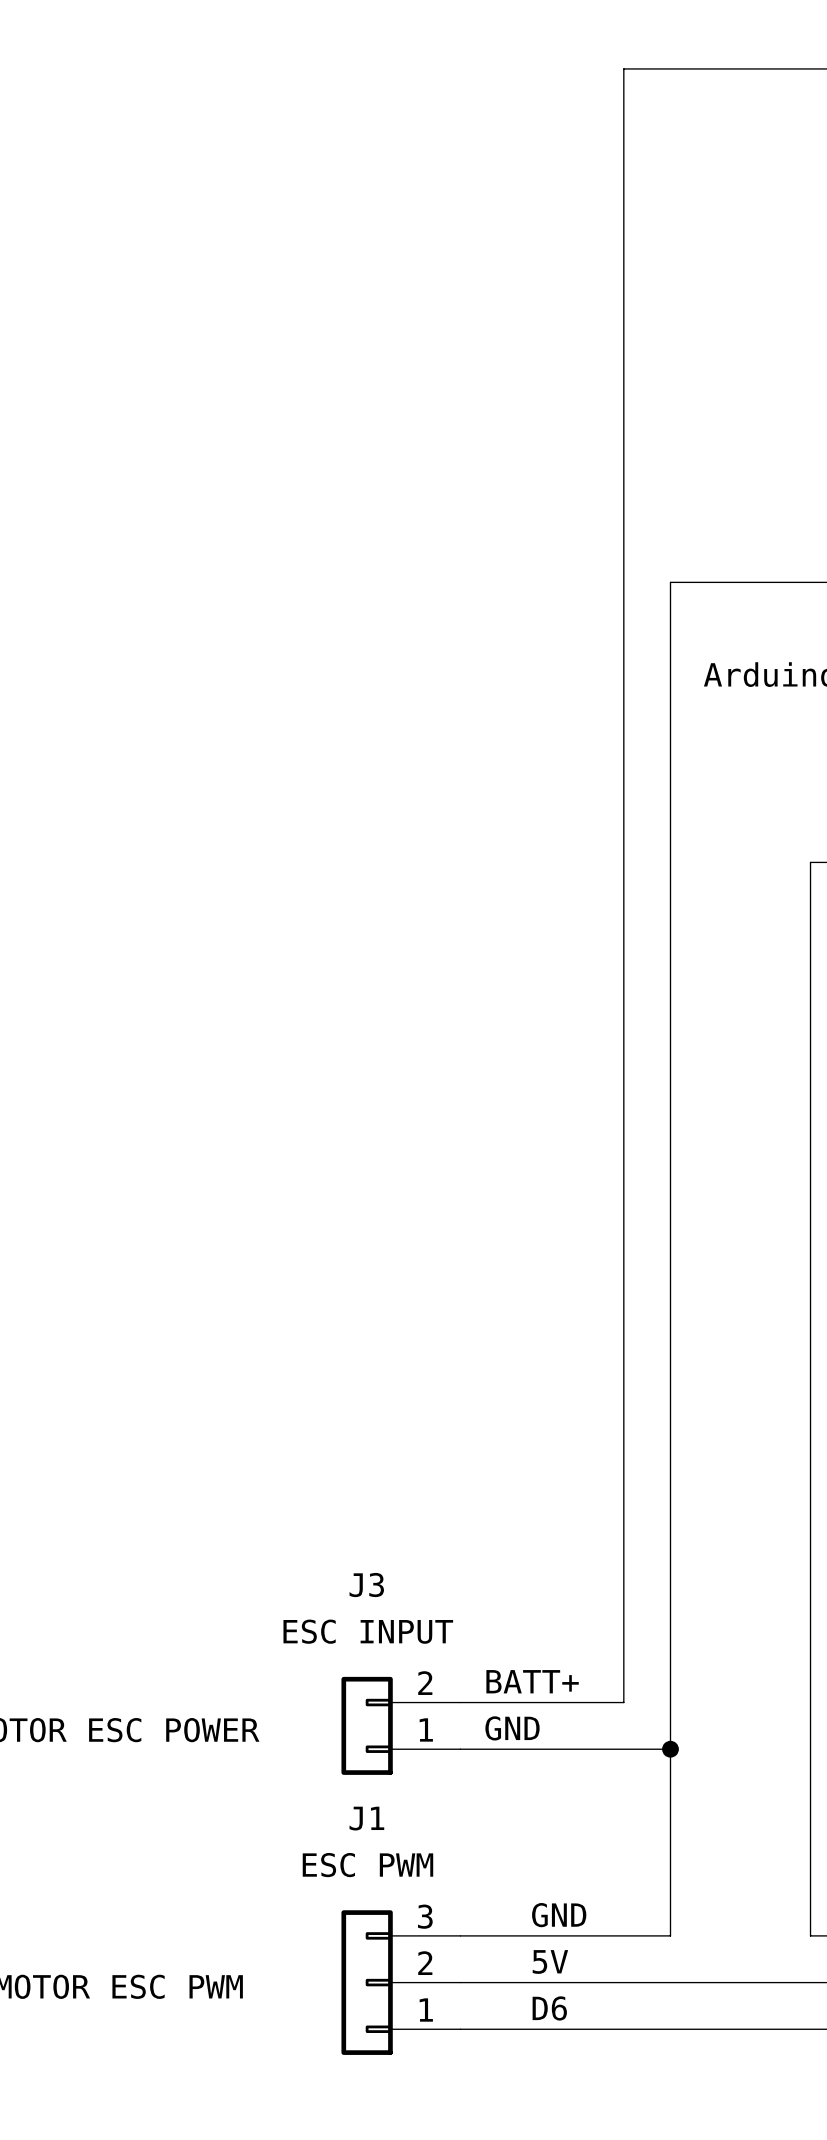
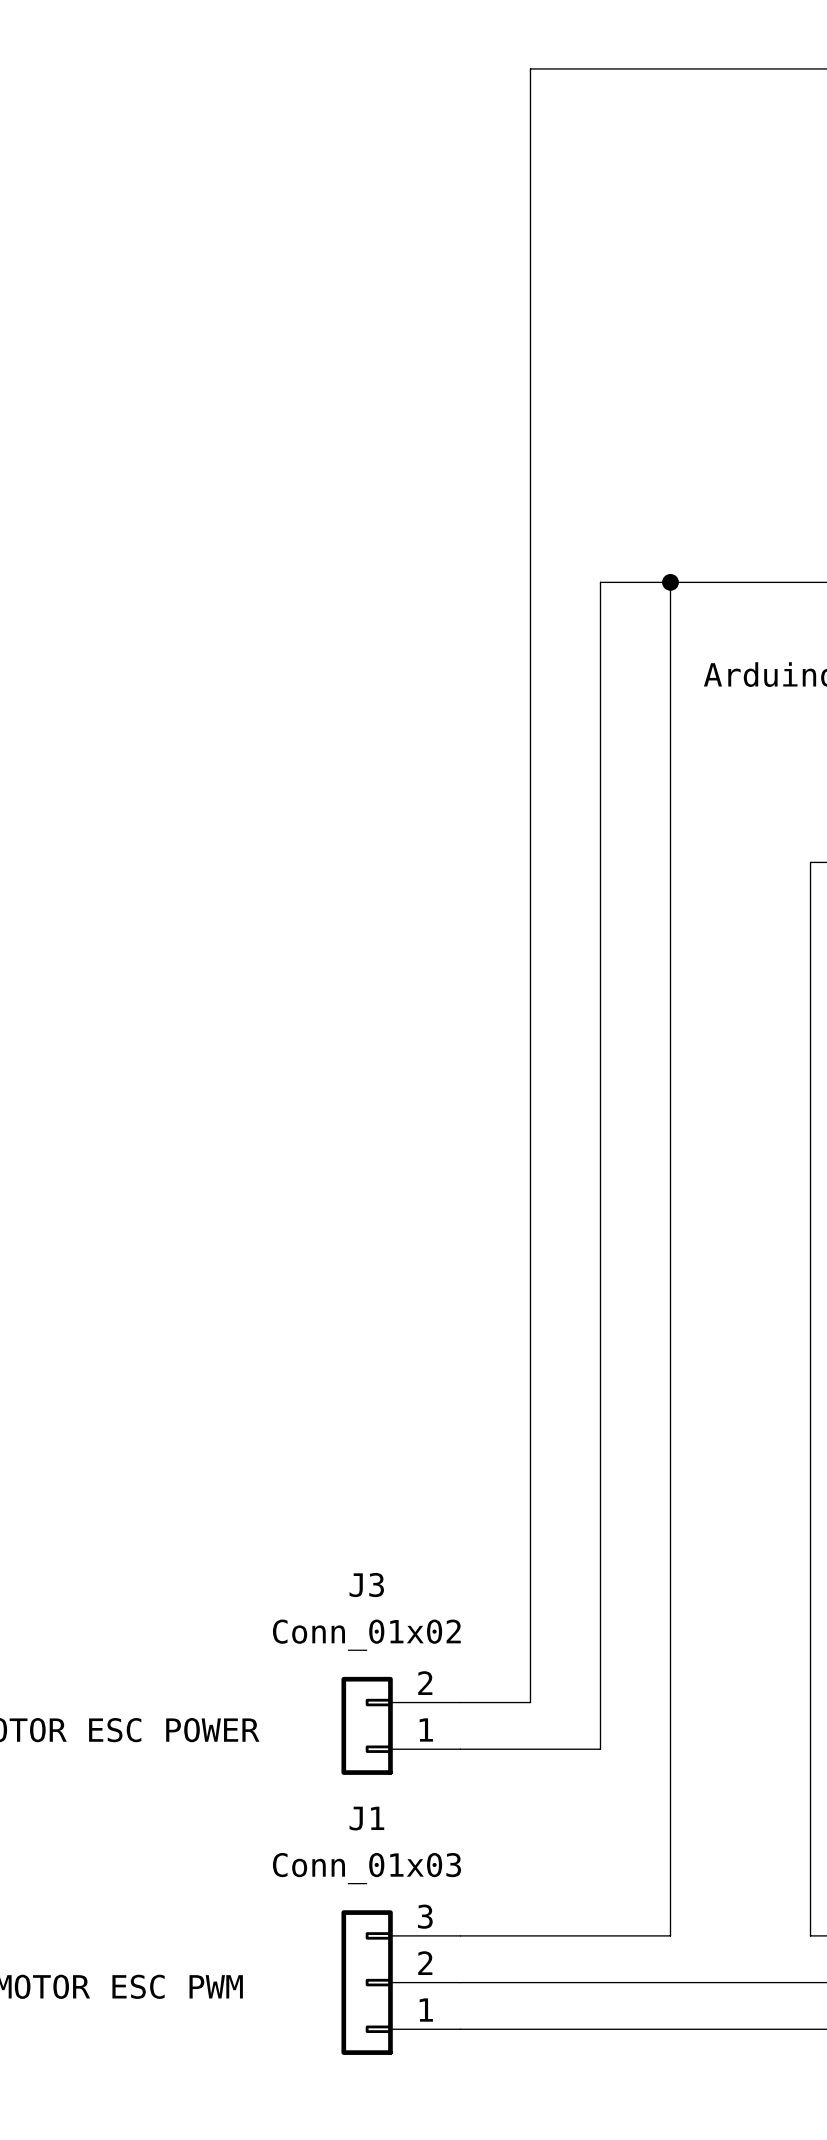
wire: (623, 68) (623, 1702) (530, 1702) -> (623, 68) (530, 68) (530, 1702)
junction: none -> (670, 582)
J3 value: ESC INPUT (368, 1631) -> Conn_01x02 (366, 1635)
label: BATT+ (532, 1681) -> none
label: GND (512, 1728) -> none
wire: (600, 1749) (670, 1749) -> (600, 1749) (600, 582) (670, 582)
junction: (670, 1749) -> none
J1 value: ESC PWM (367, 1865) -> Conn_01x03 (367, 1868)
label: GND (559, 1915) -> none
label: 5V (550, 1961) -> none
label: D6 (549, 2008) -> none

